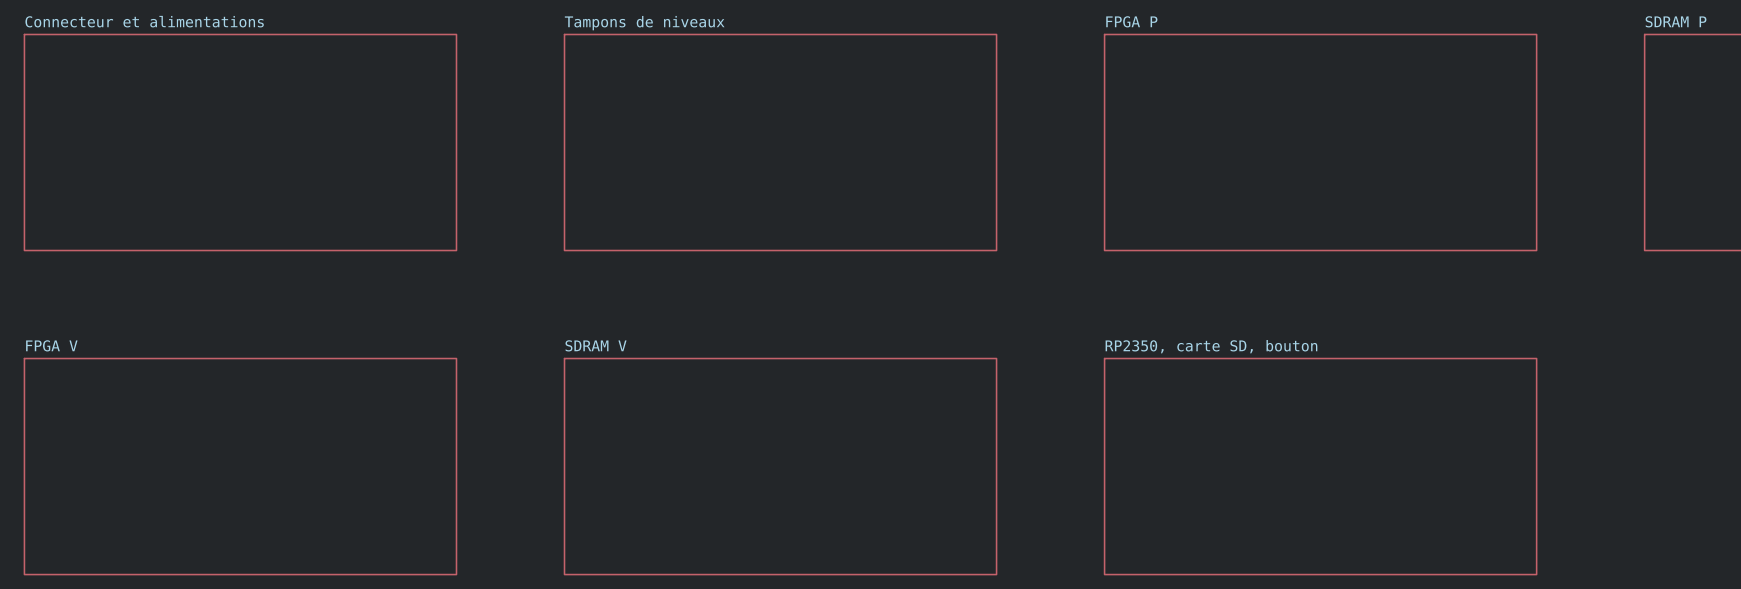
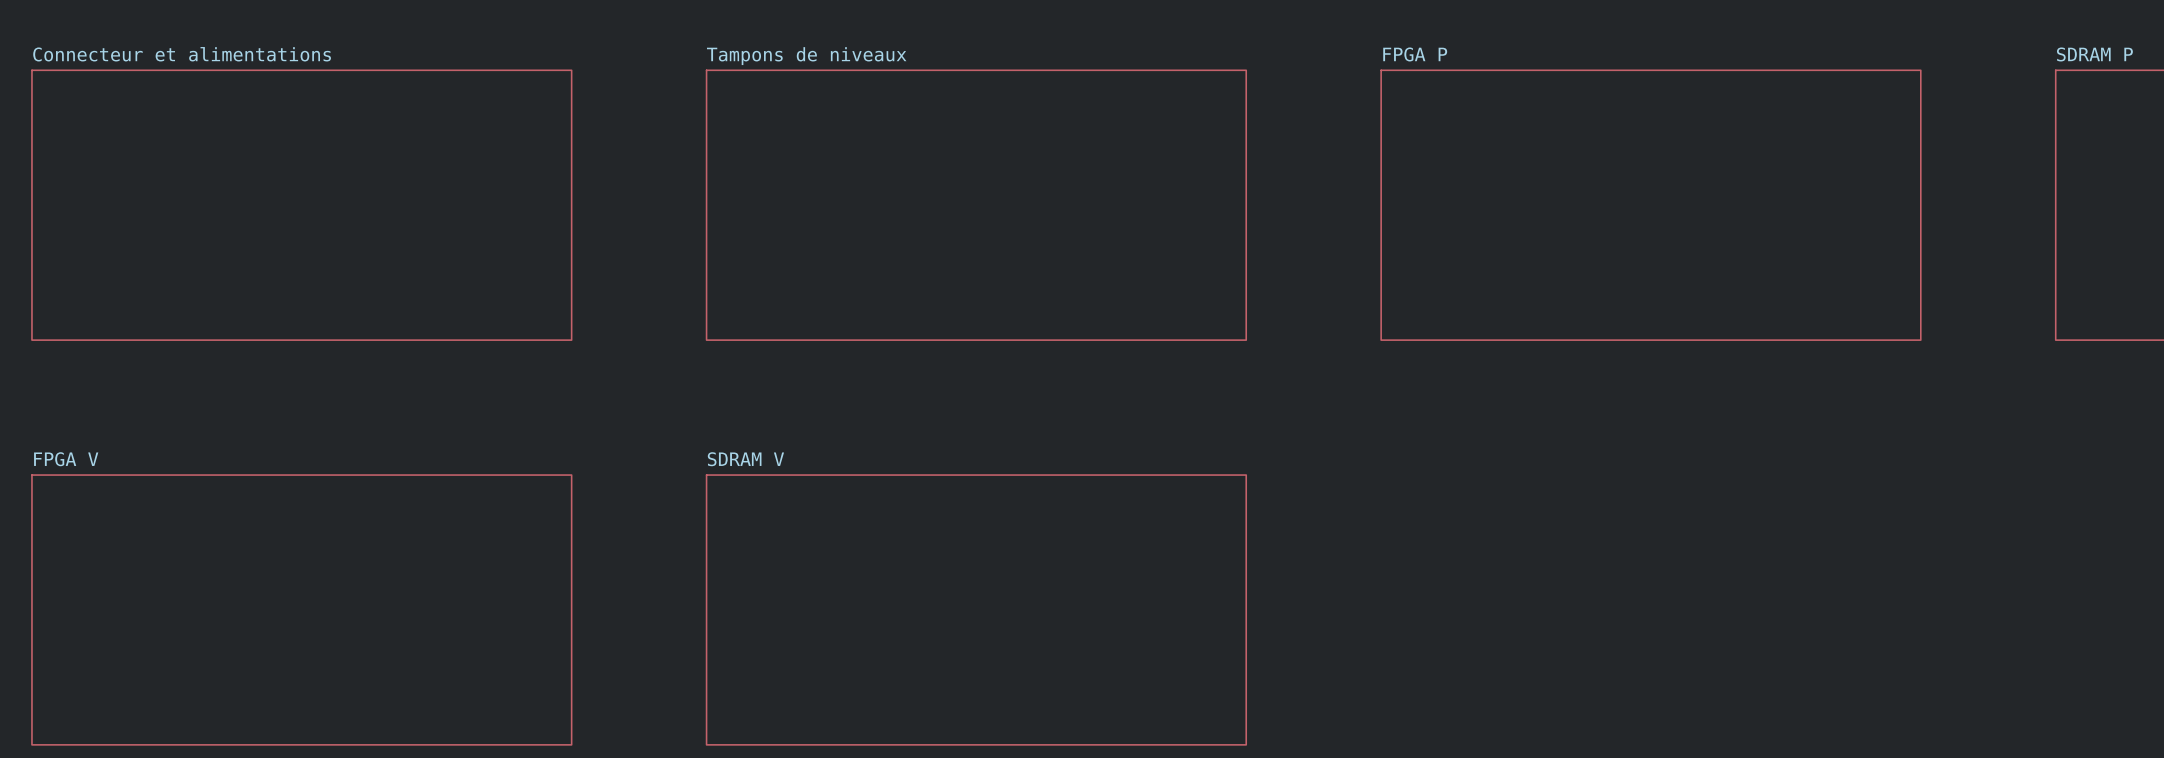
sheet RP2350, carte SD, bouton: (1320, 466) -> none

